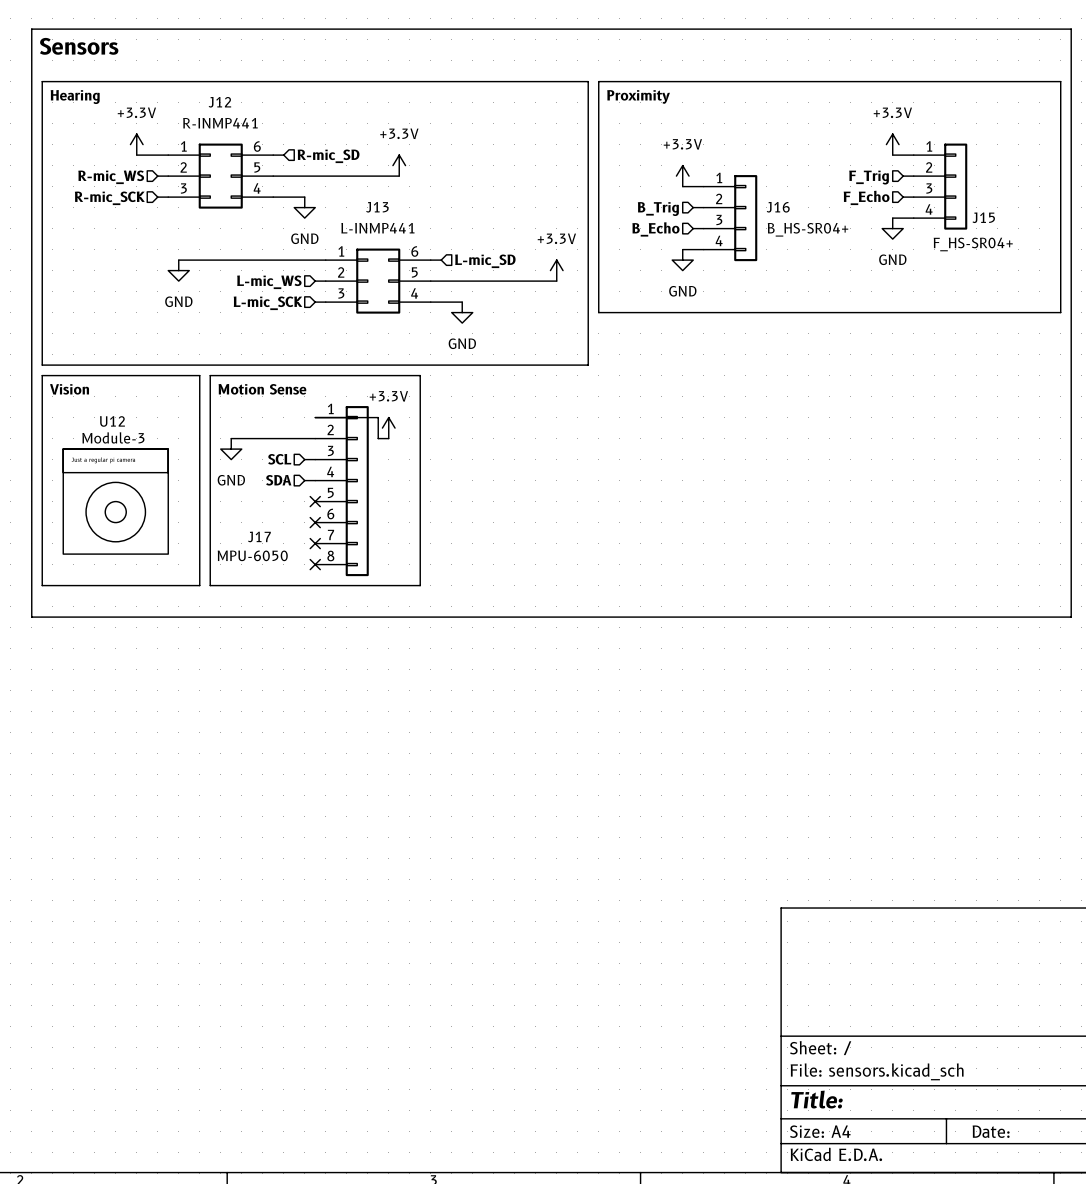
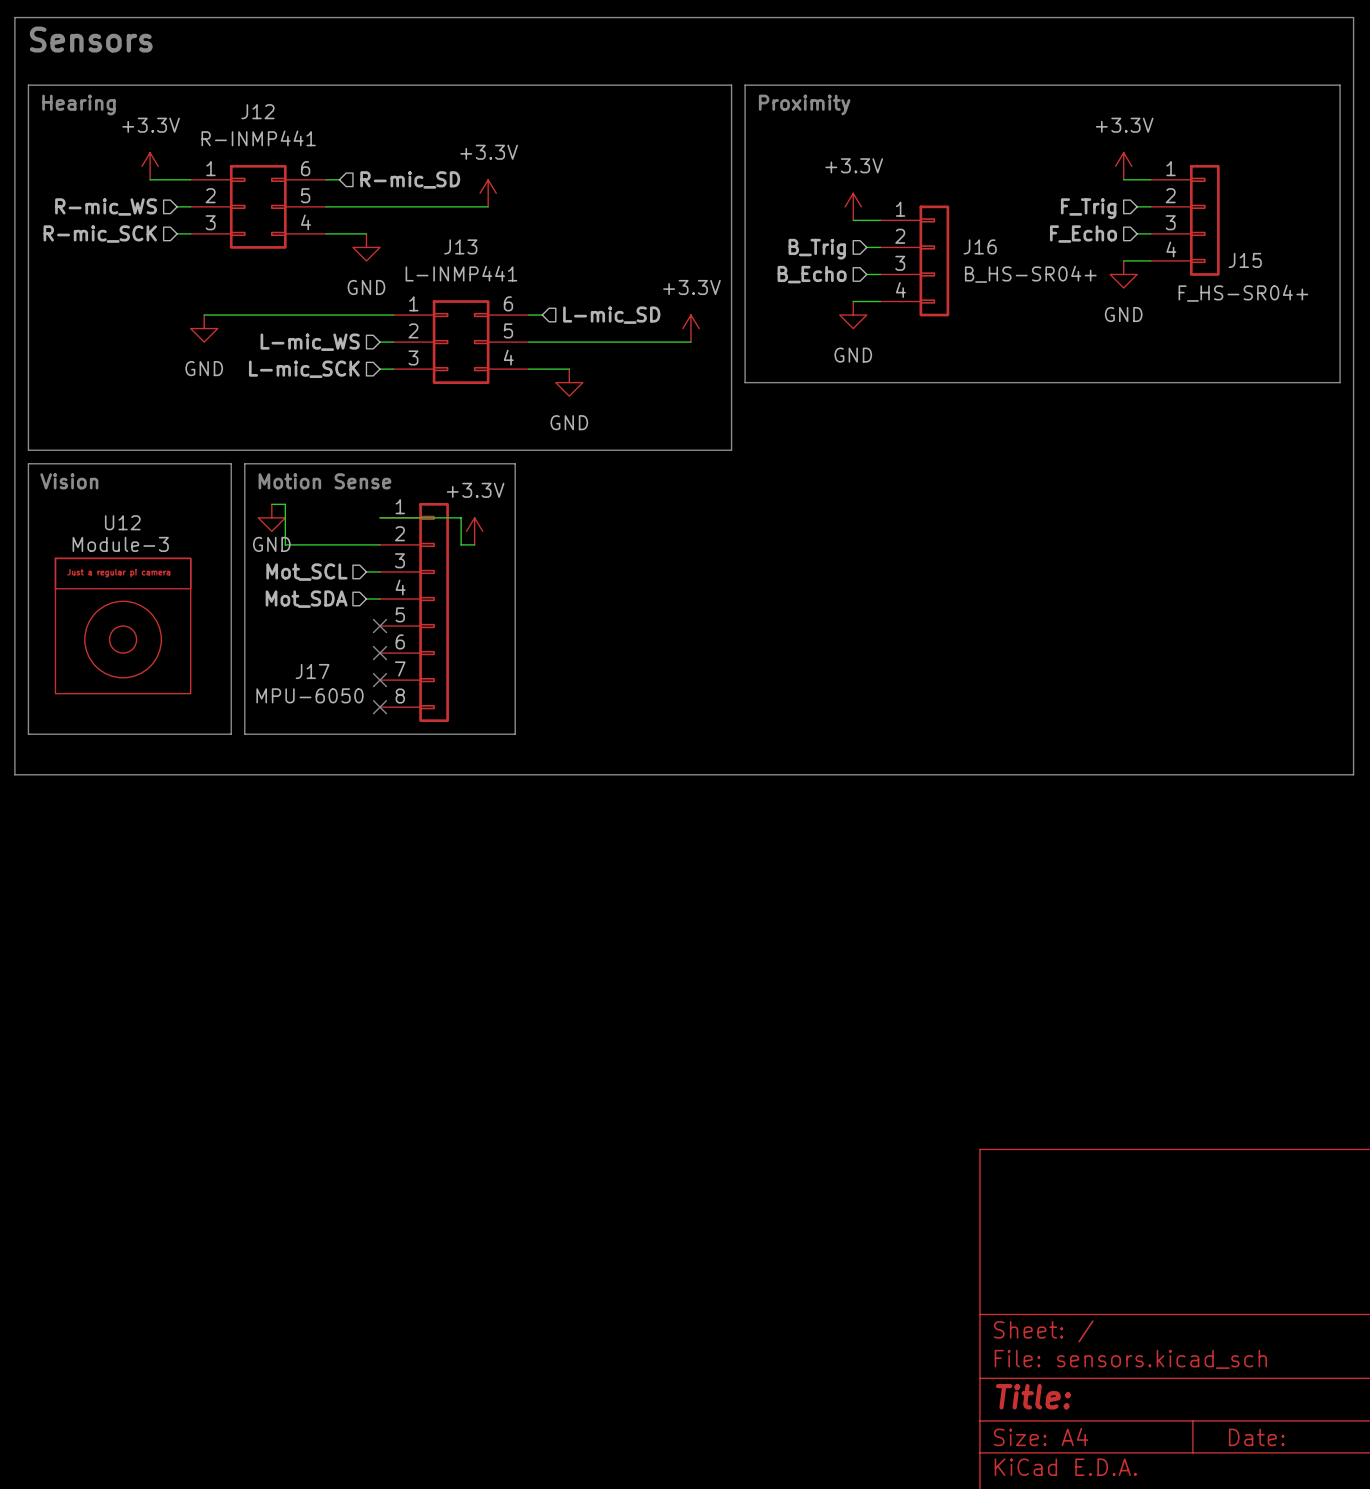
wire: (231, 438) (241, 438) -> (271, 504) (285, 504) (285, 544)
power symbol position: GND (231, 449) -> GND (271, 517)
hierarchical label: SCL (279, 459) -> Mot_SCL (306, 572)
power symbol text position: GND (231, 480) -> GND (271, 544)
hierarchical label: SDA (278, 480) -> Mot_SDA (306, 599)

